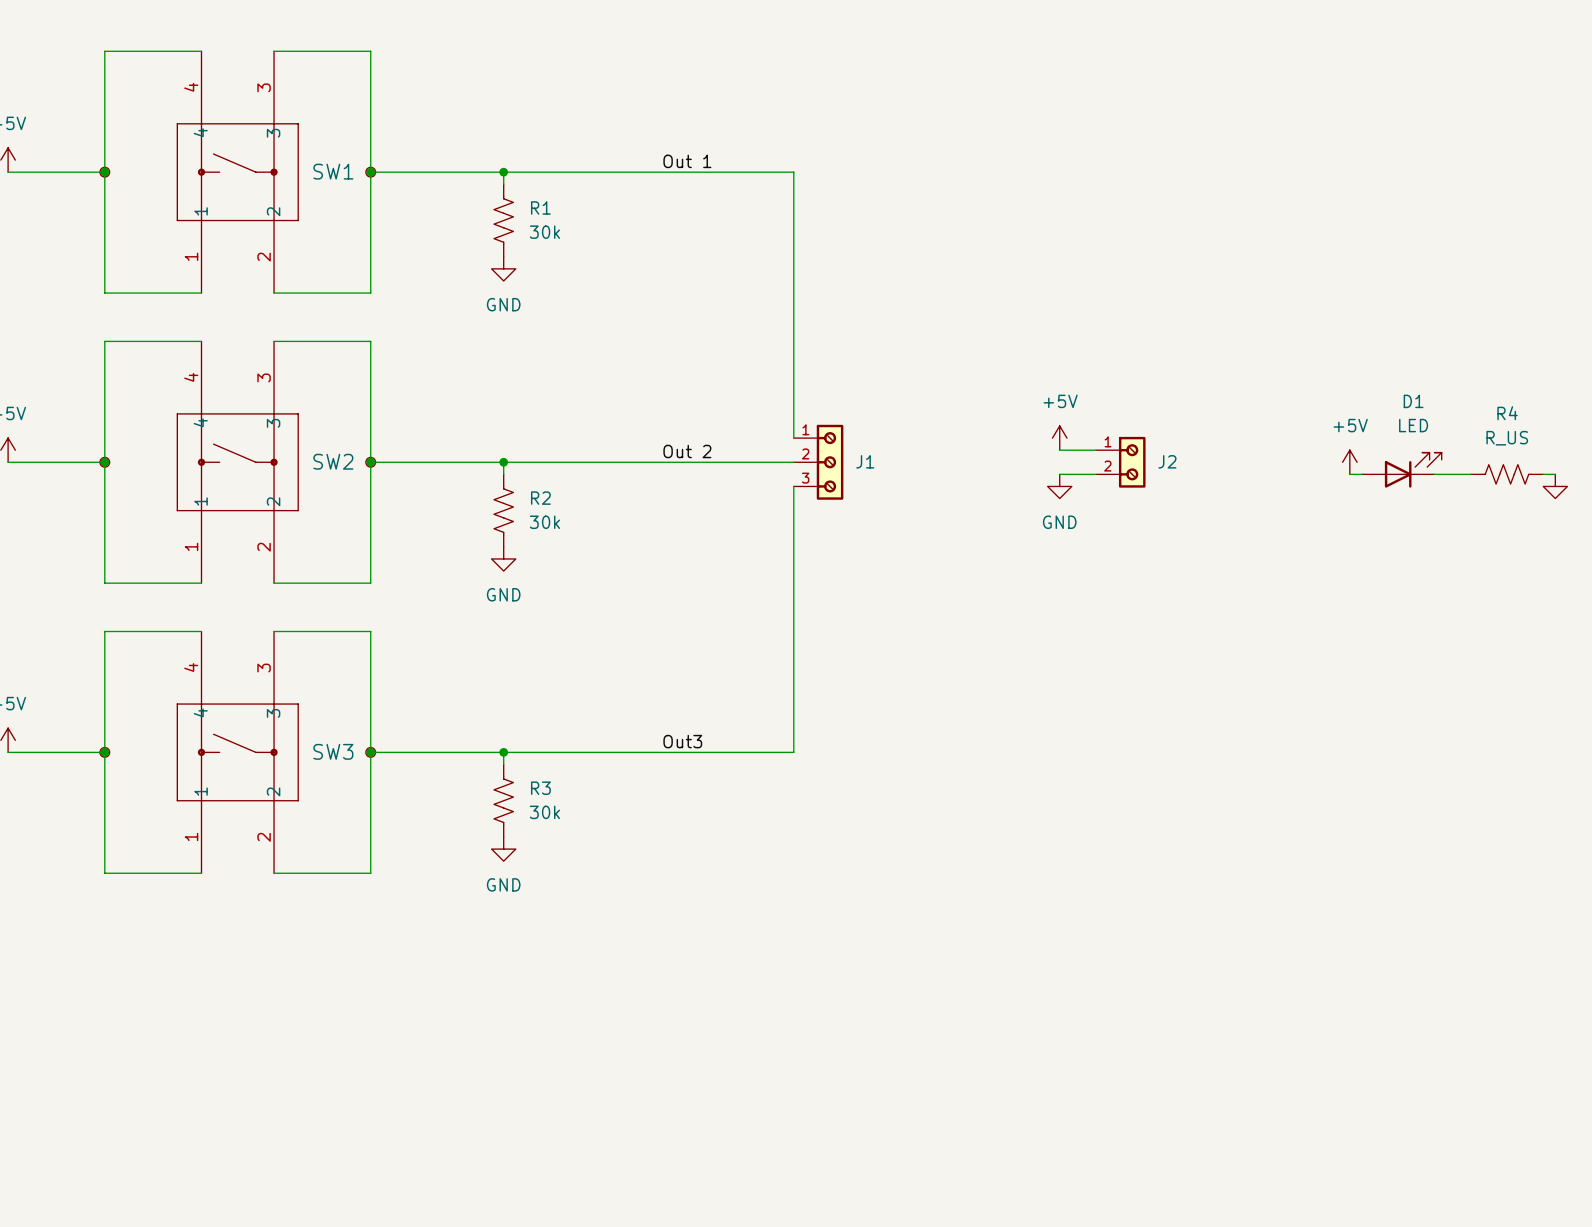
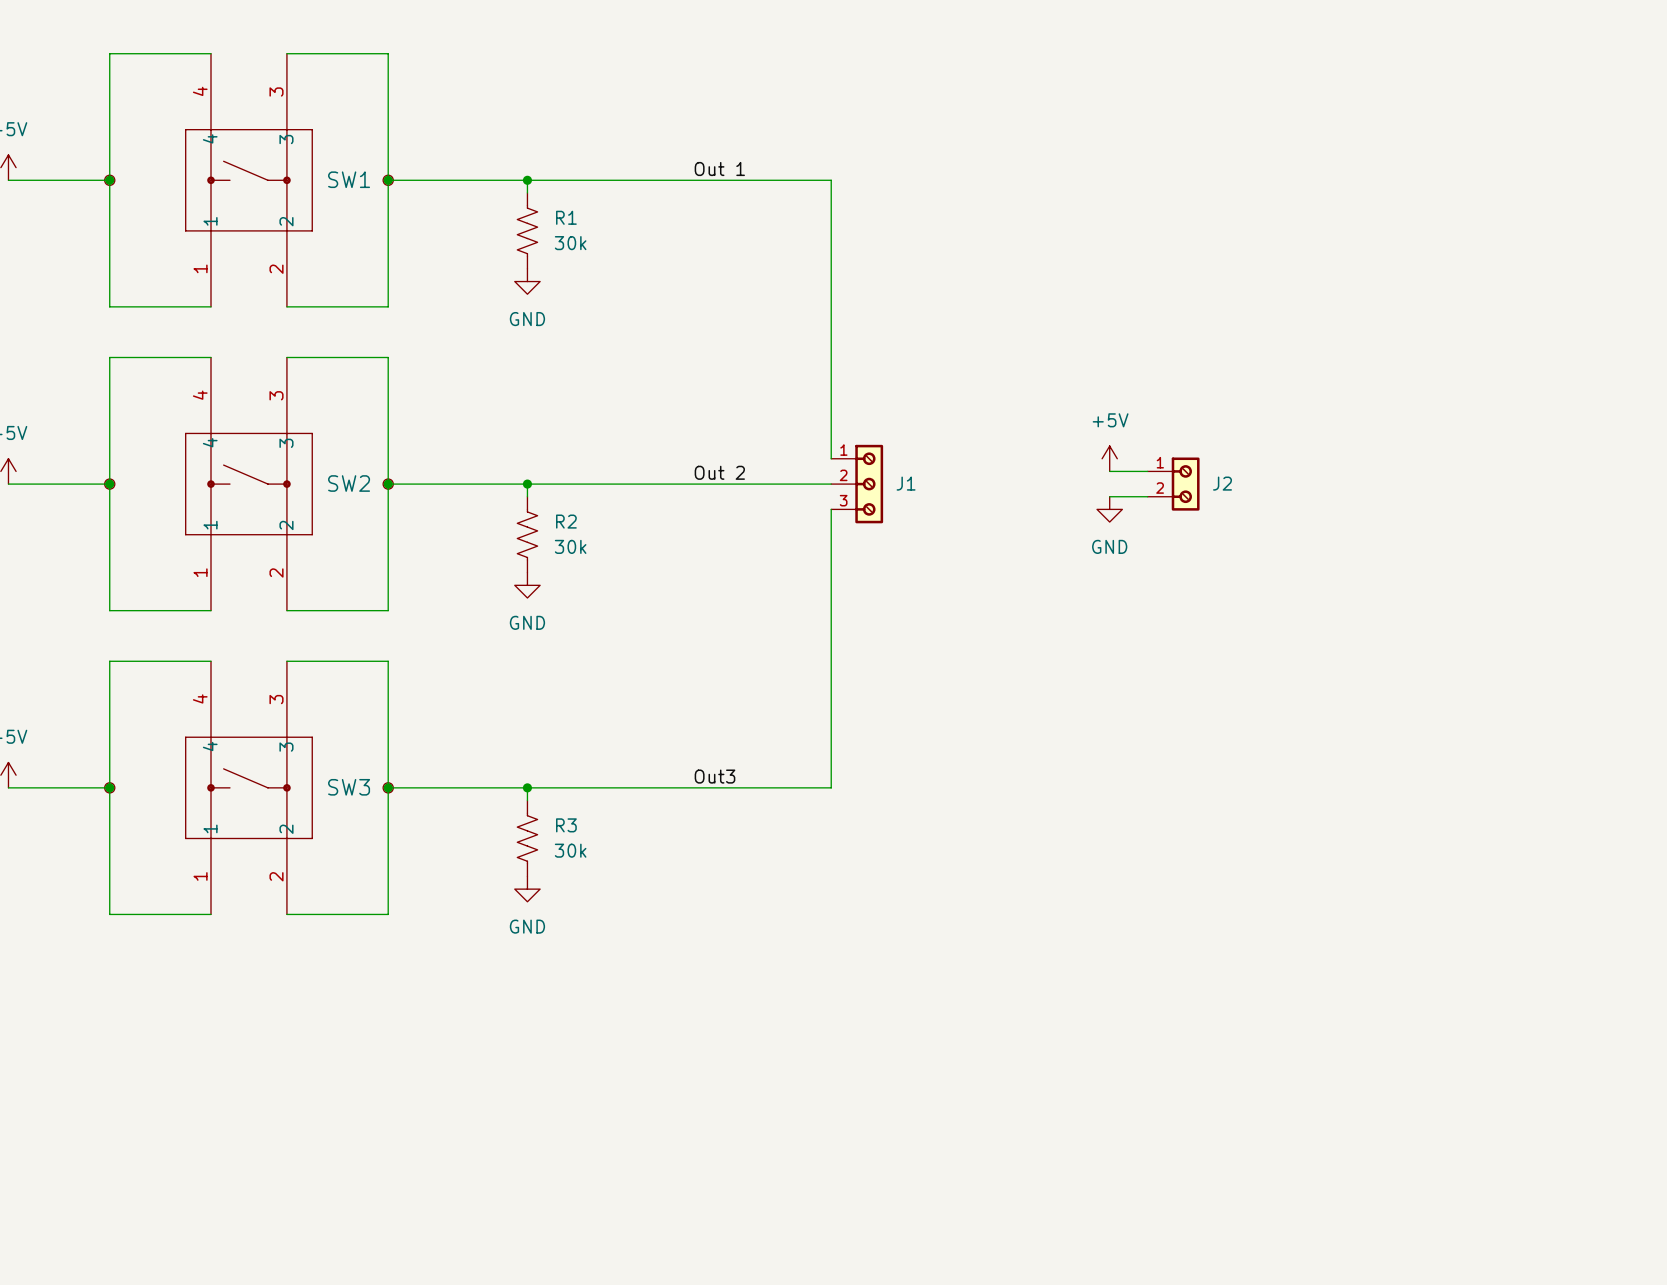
power symbol: +5V (1349, 462) -> none
D1: LED (1401, 470) -> none
wire: (1349, 474) (1361, 474) -> none
wire: (1434, 474) (1470, 474) -> none
R4: R_US (1506, 474) -> none
wire: (1543, 474) (1555, 474) -> none
power symbol: (1555, 486) -> none

